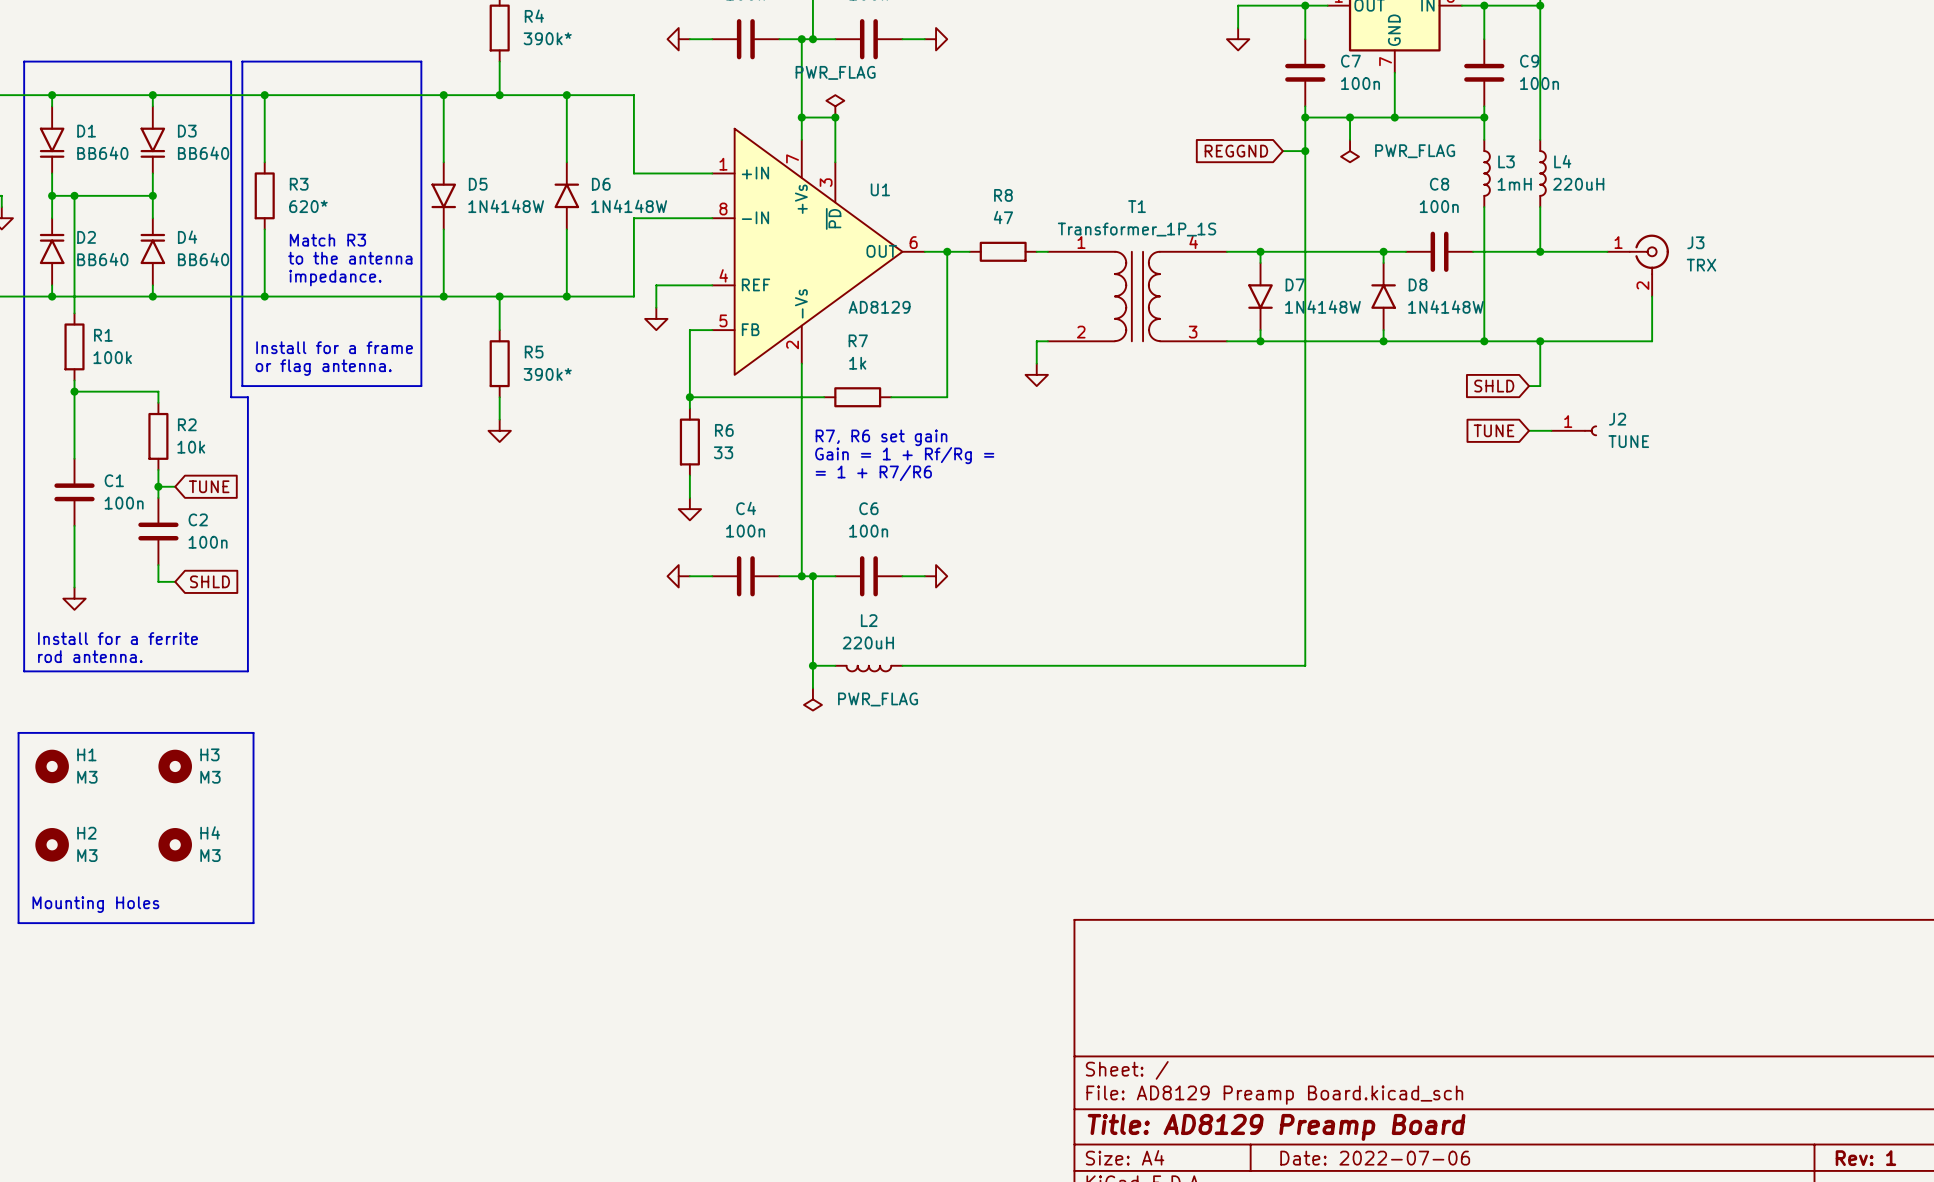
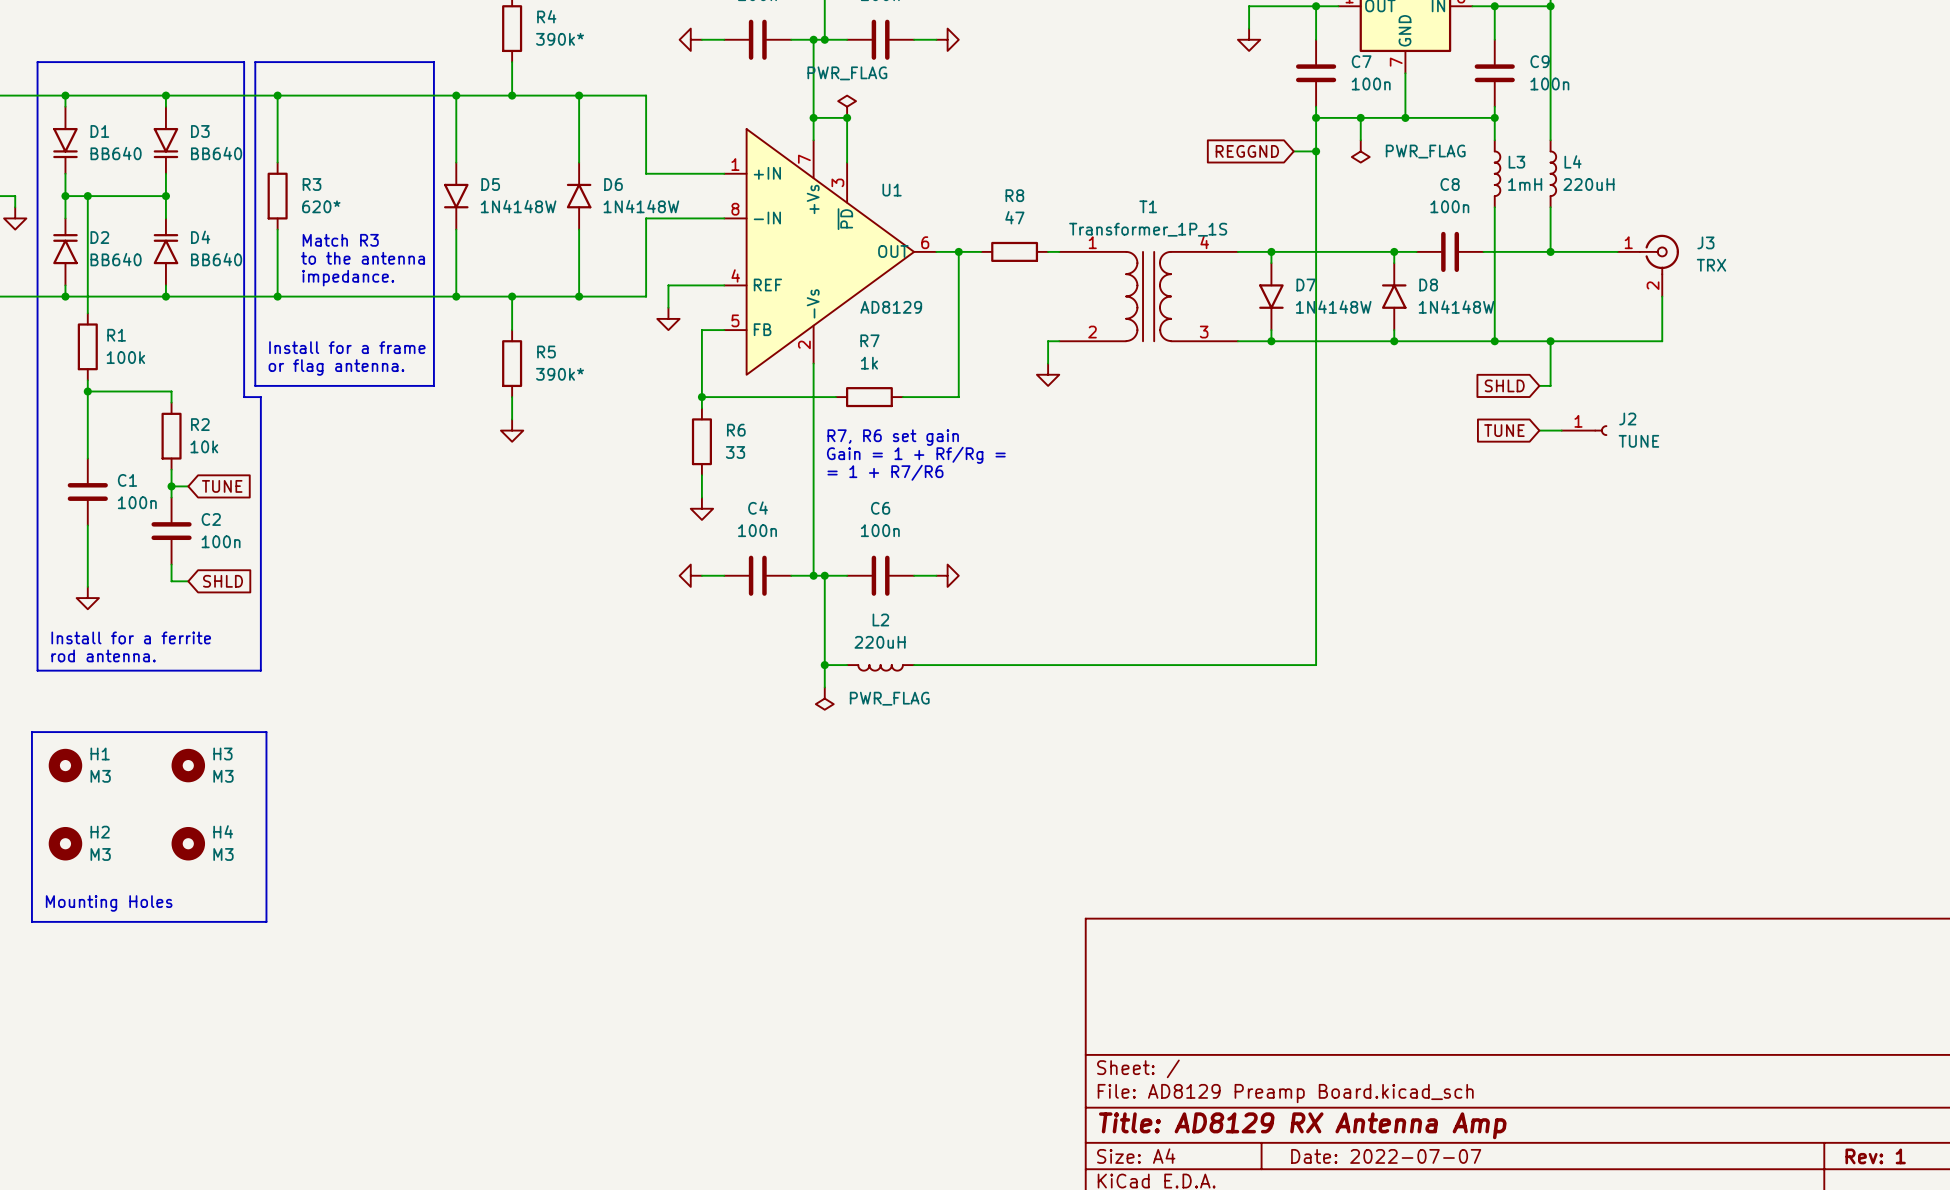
title block: Title: AD8129 Preamp Board (1276, 1127) -> Title: AD8129 RX Antenna Amp (1302, 1125)
title block: Date: 2022-07-06 (1375, 1158) -> Date: 2022-07-07 (1386, 1156)

